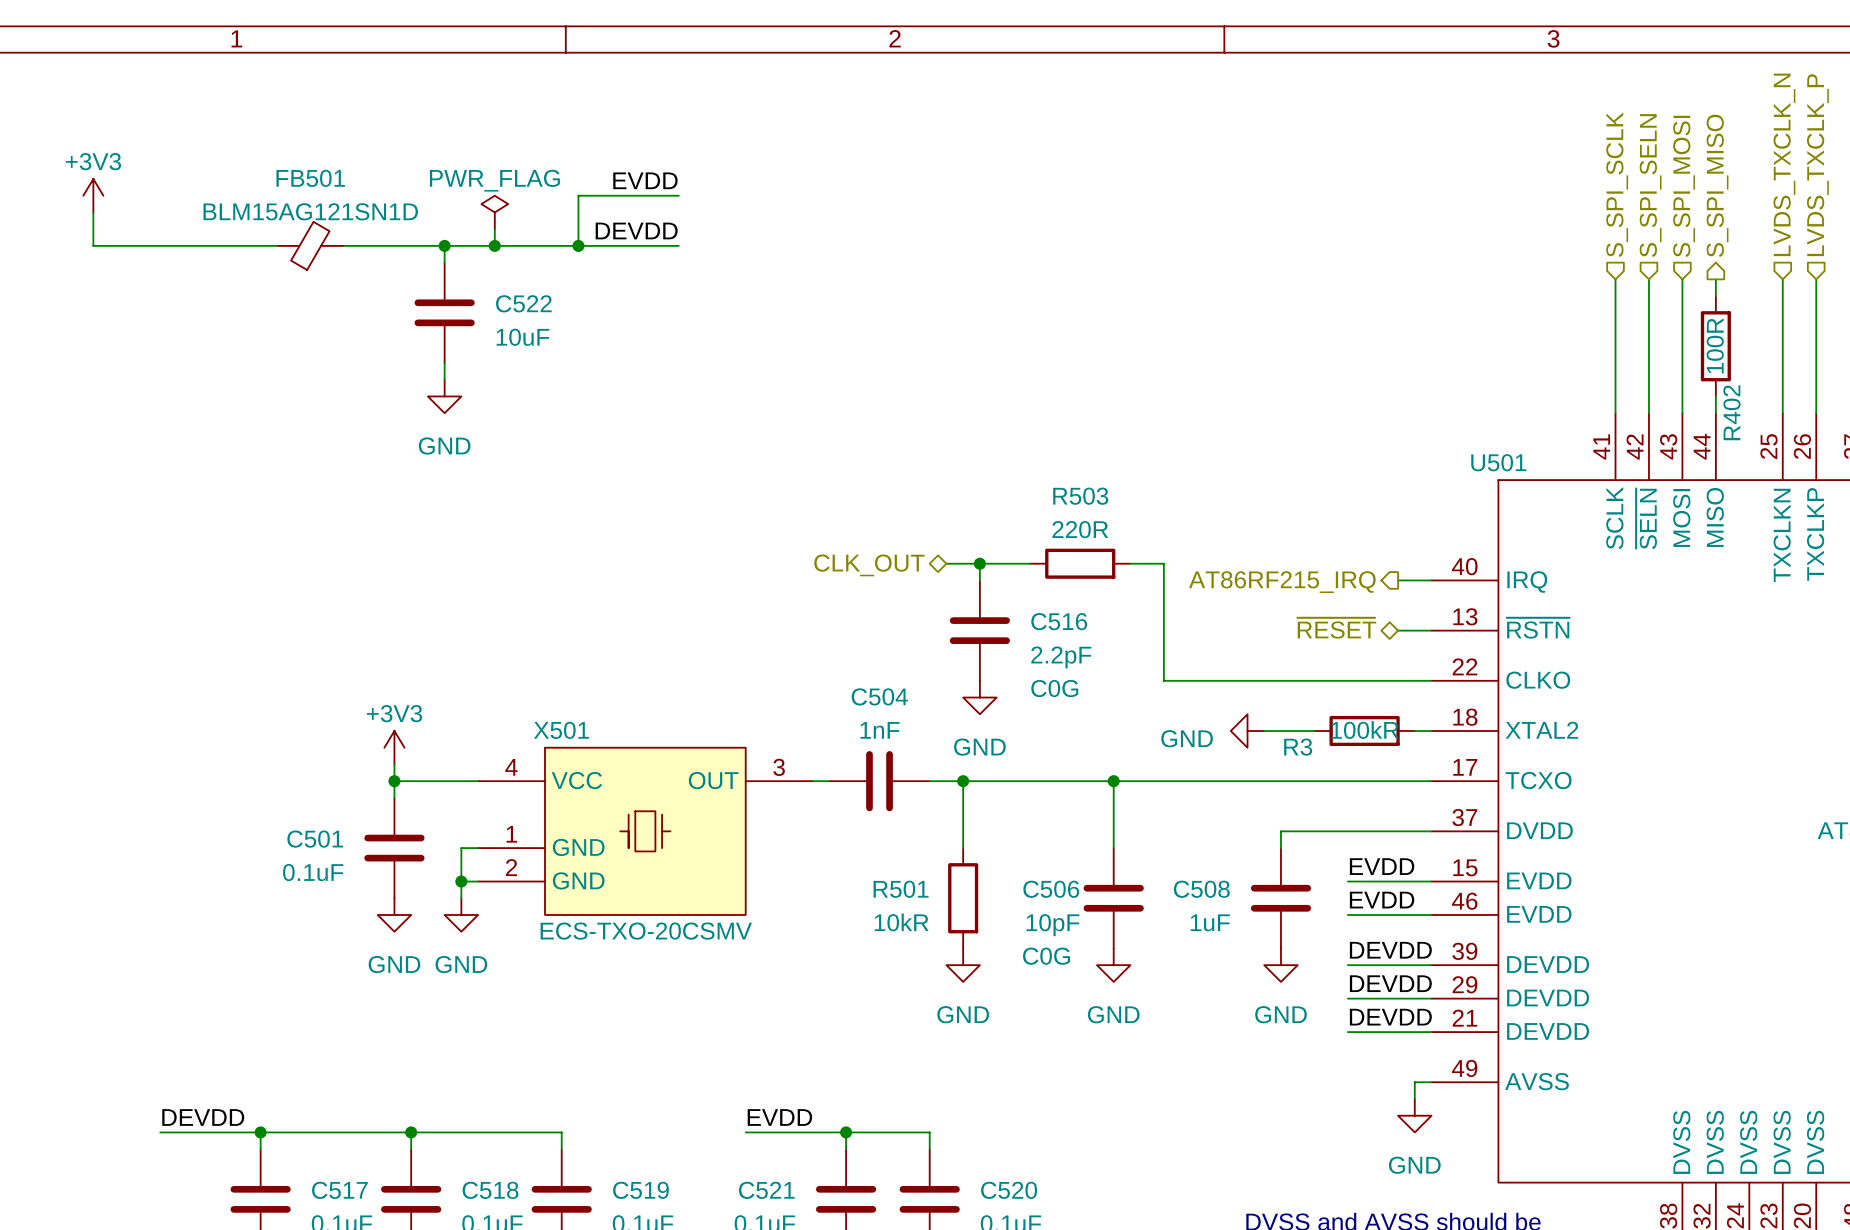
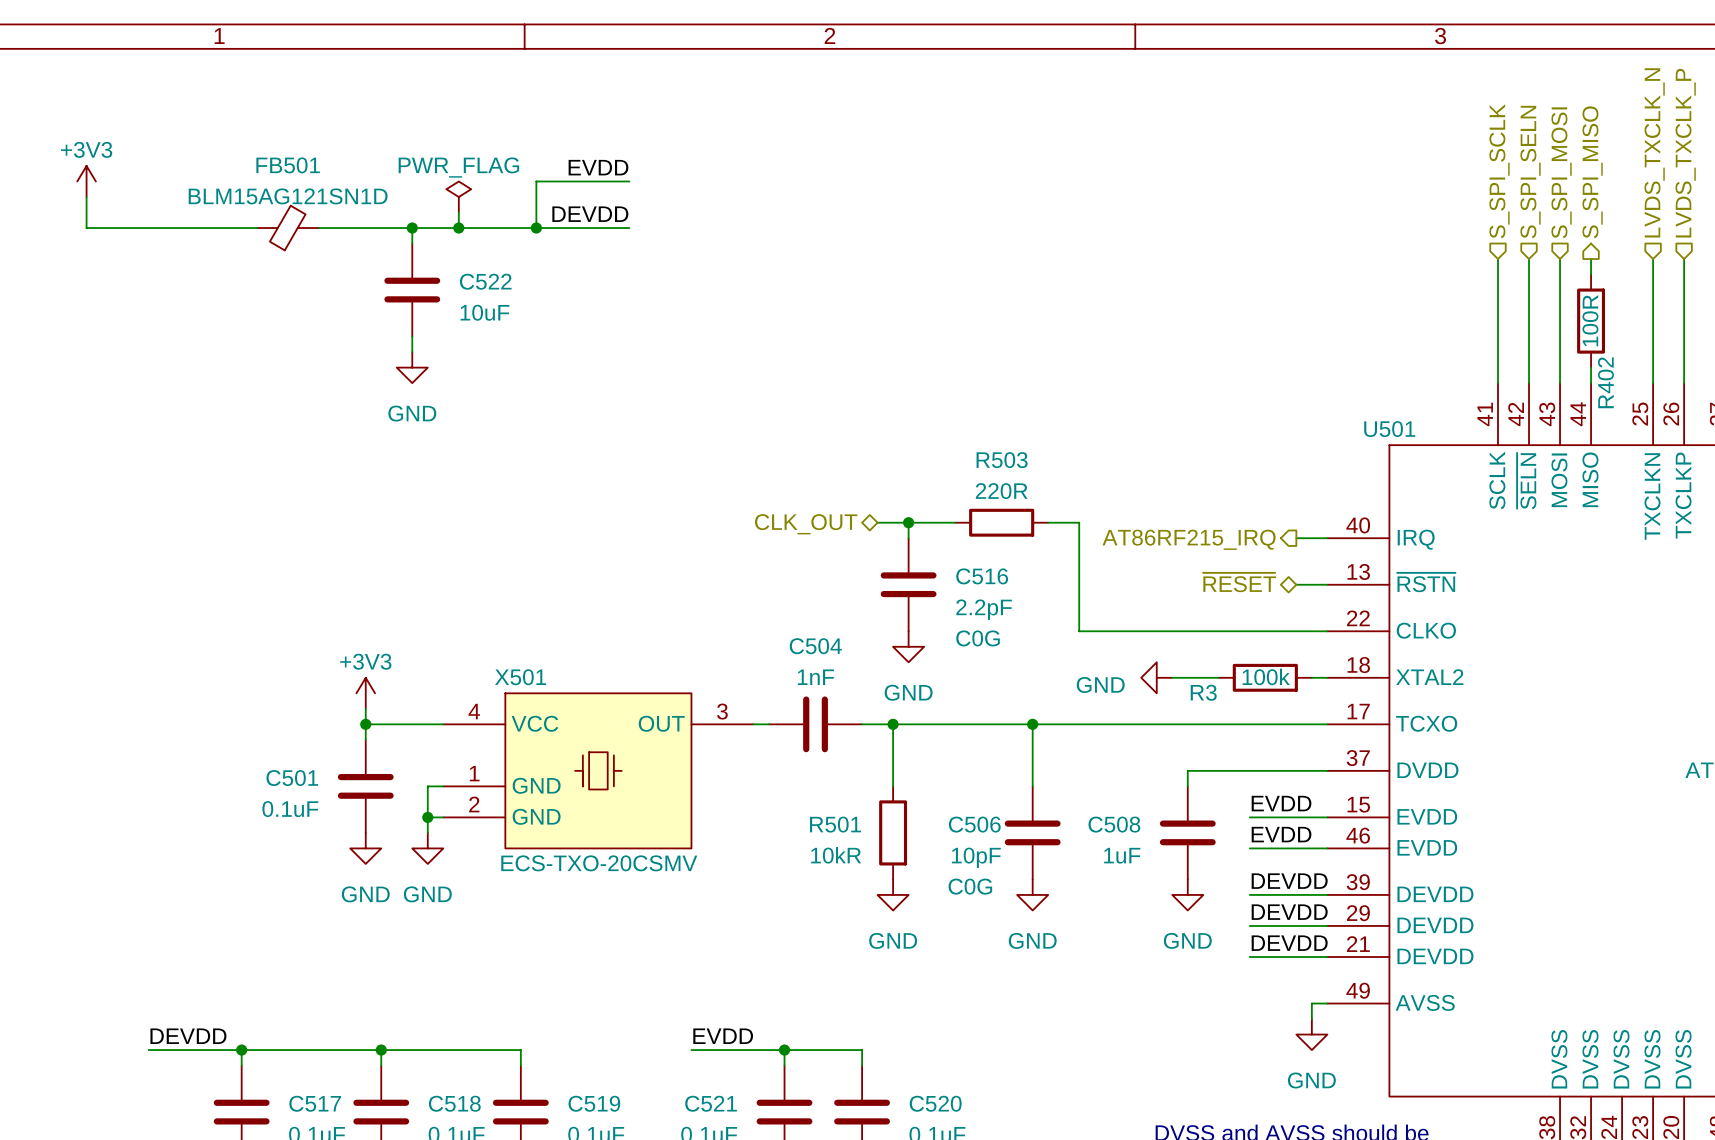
R3 value: 100kR (1364, 730) -> 100k (1266, 676)

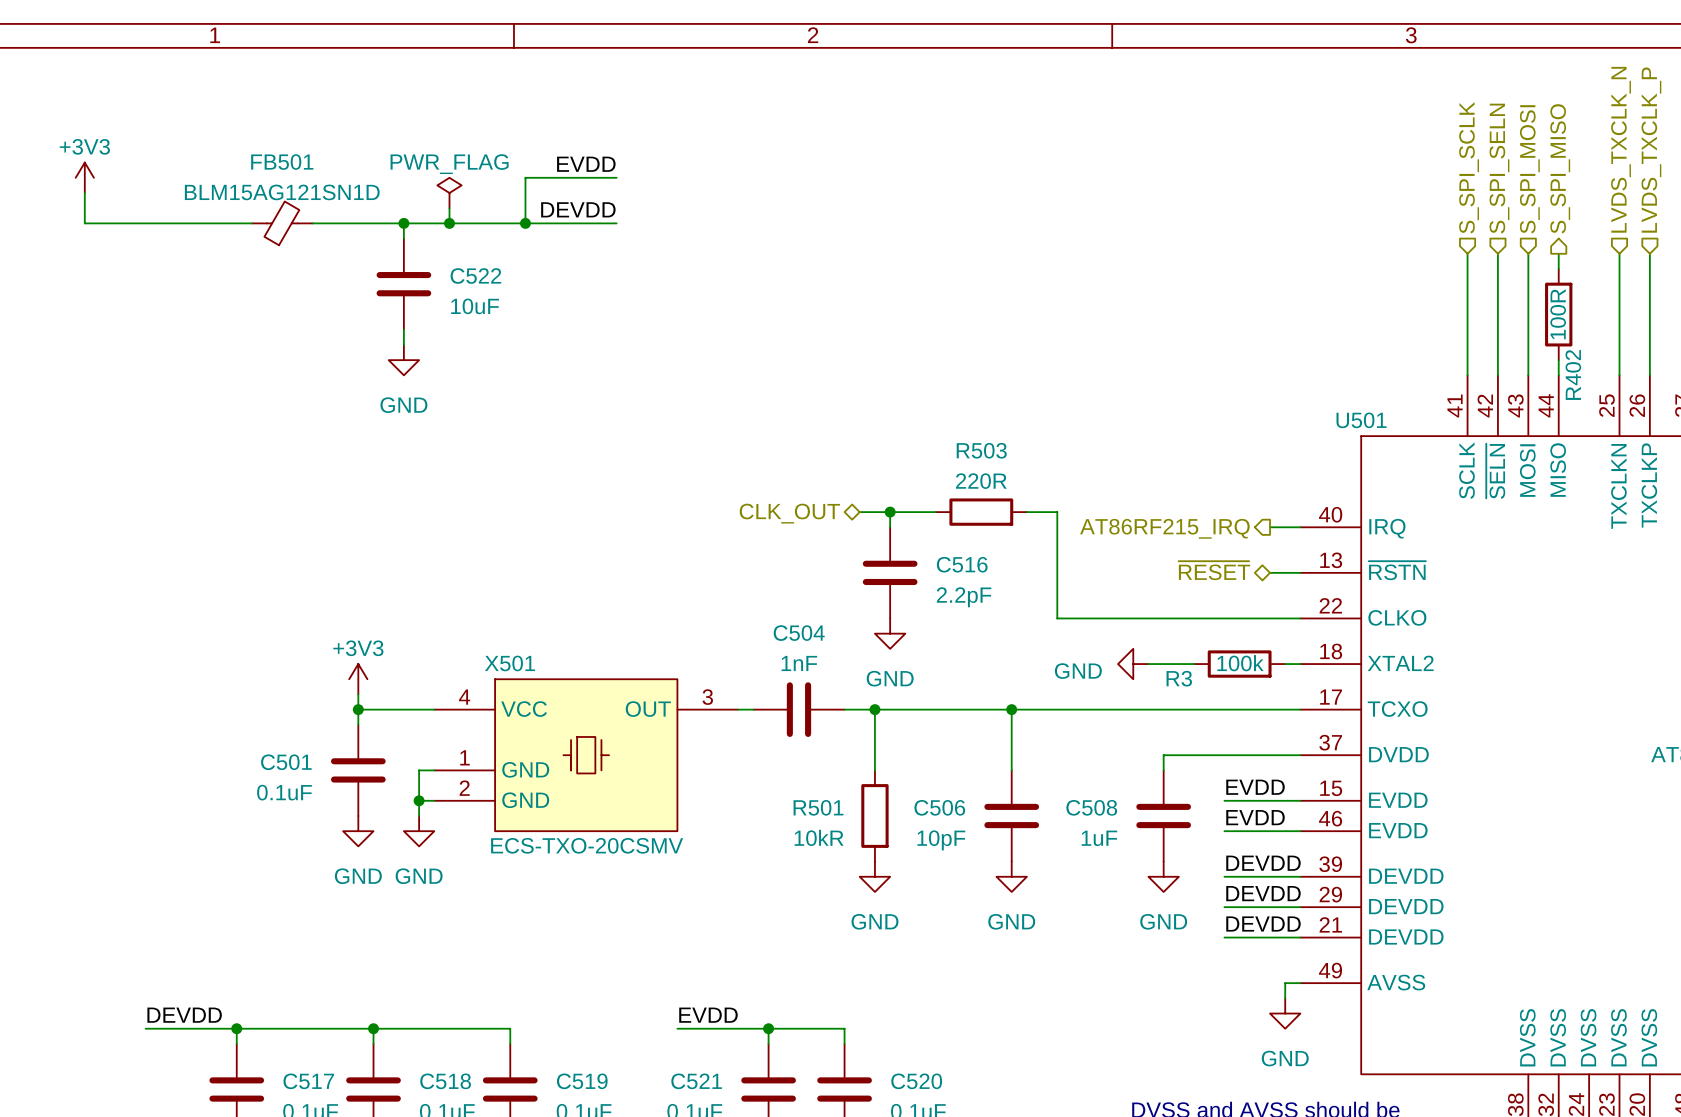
C516 text: C0G (978, 638) -> none
C506 name position: C506 (974, 824) -> C506 (939, 807)
C506 value position: 10pF (976, 857) -> 10pF (941, 840)
C506 text: C0G (970, 886) -> none

